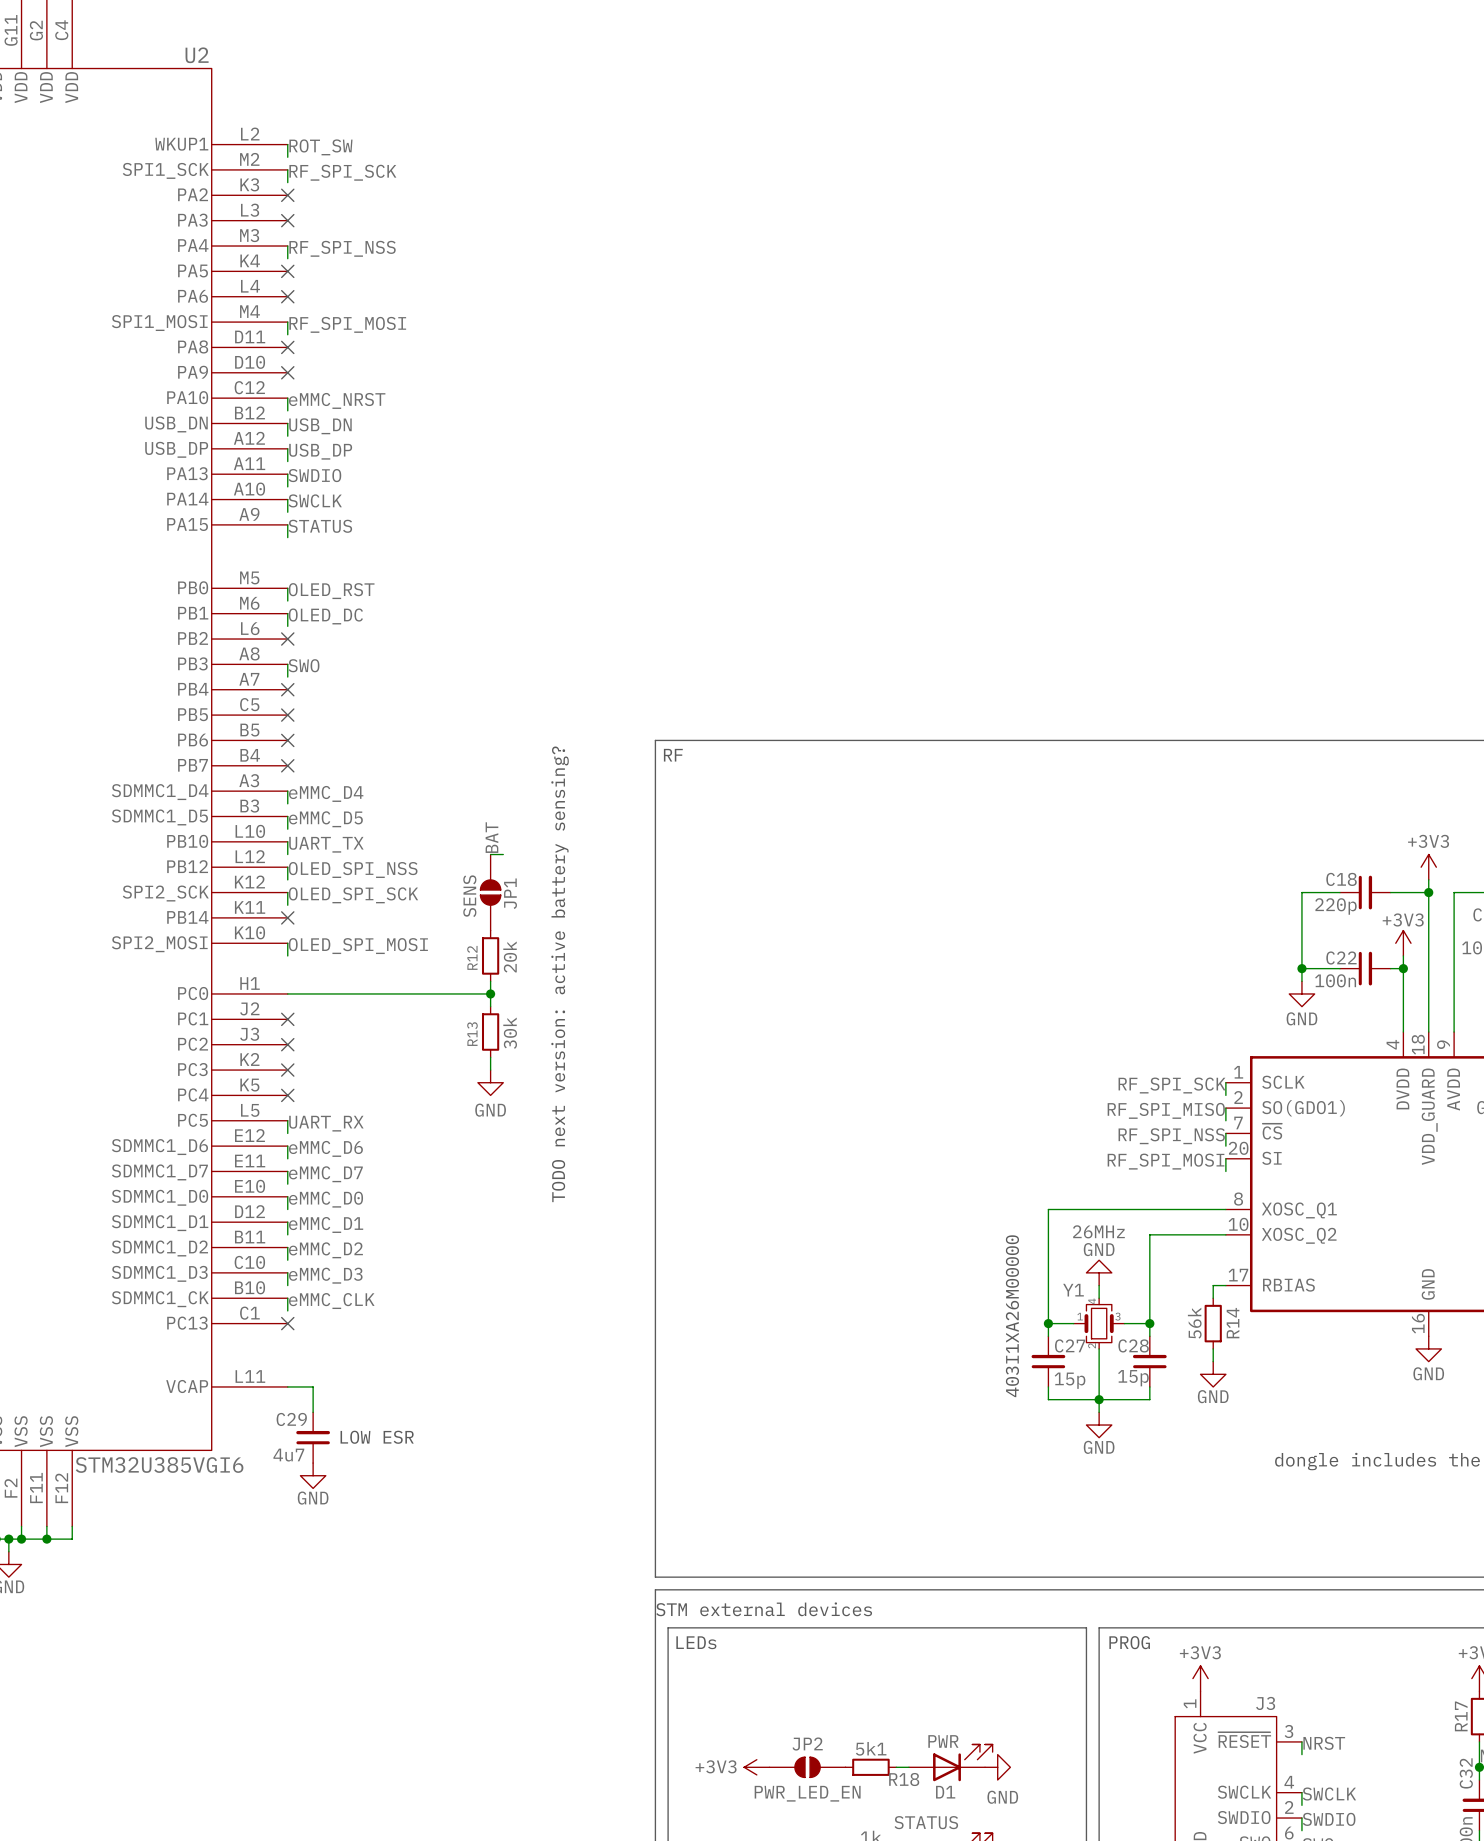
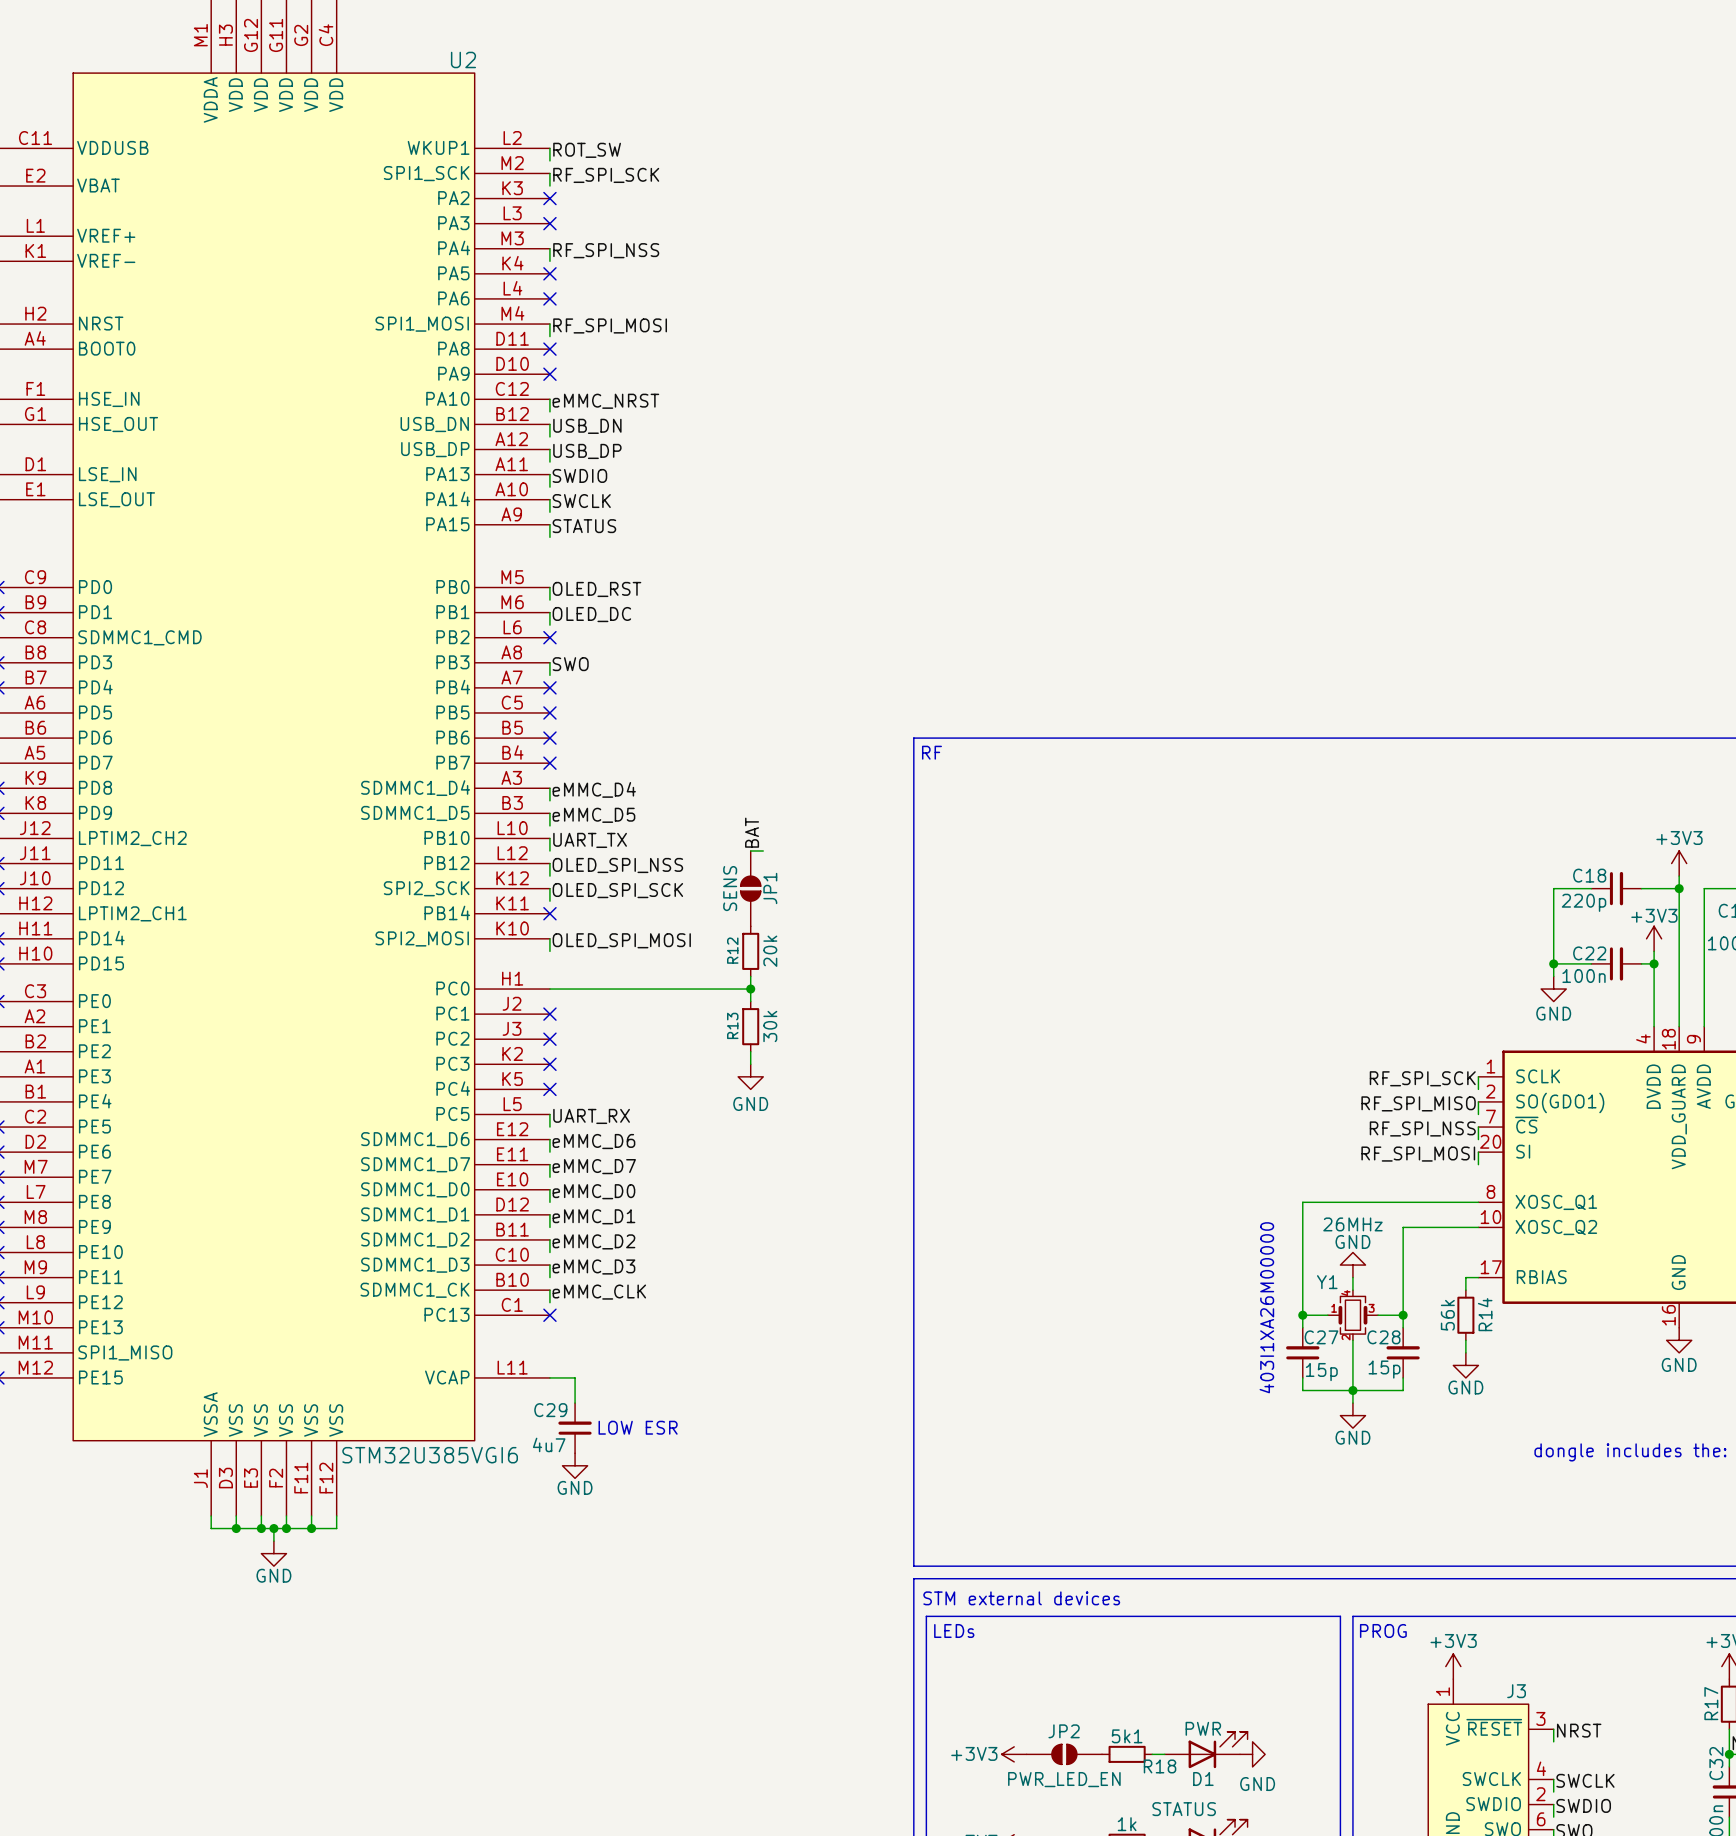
text: TODO next version: active battery sensing? (560, 974) -> none

